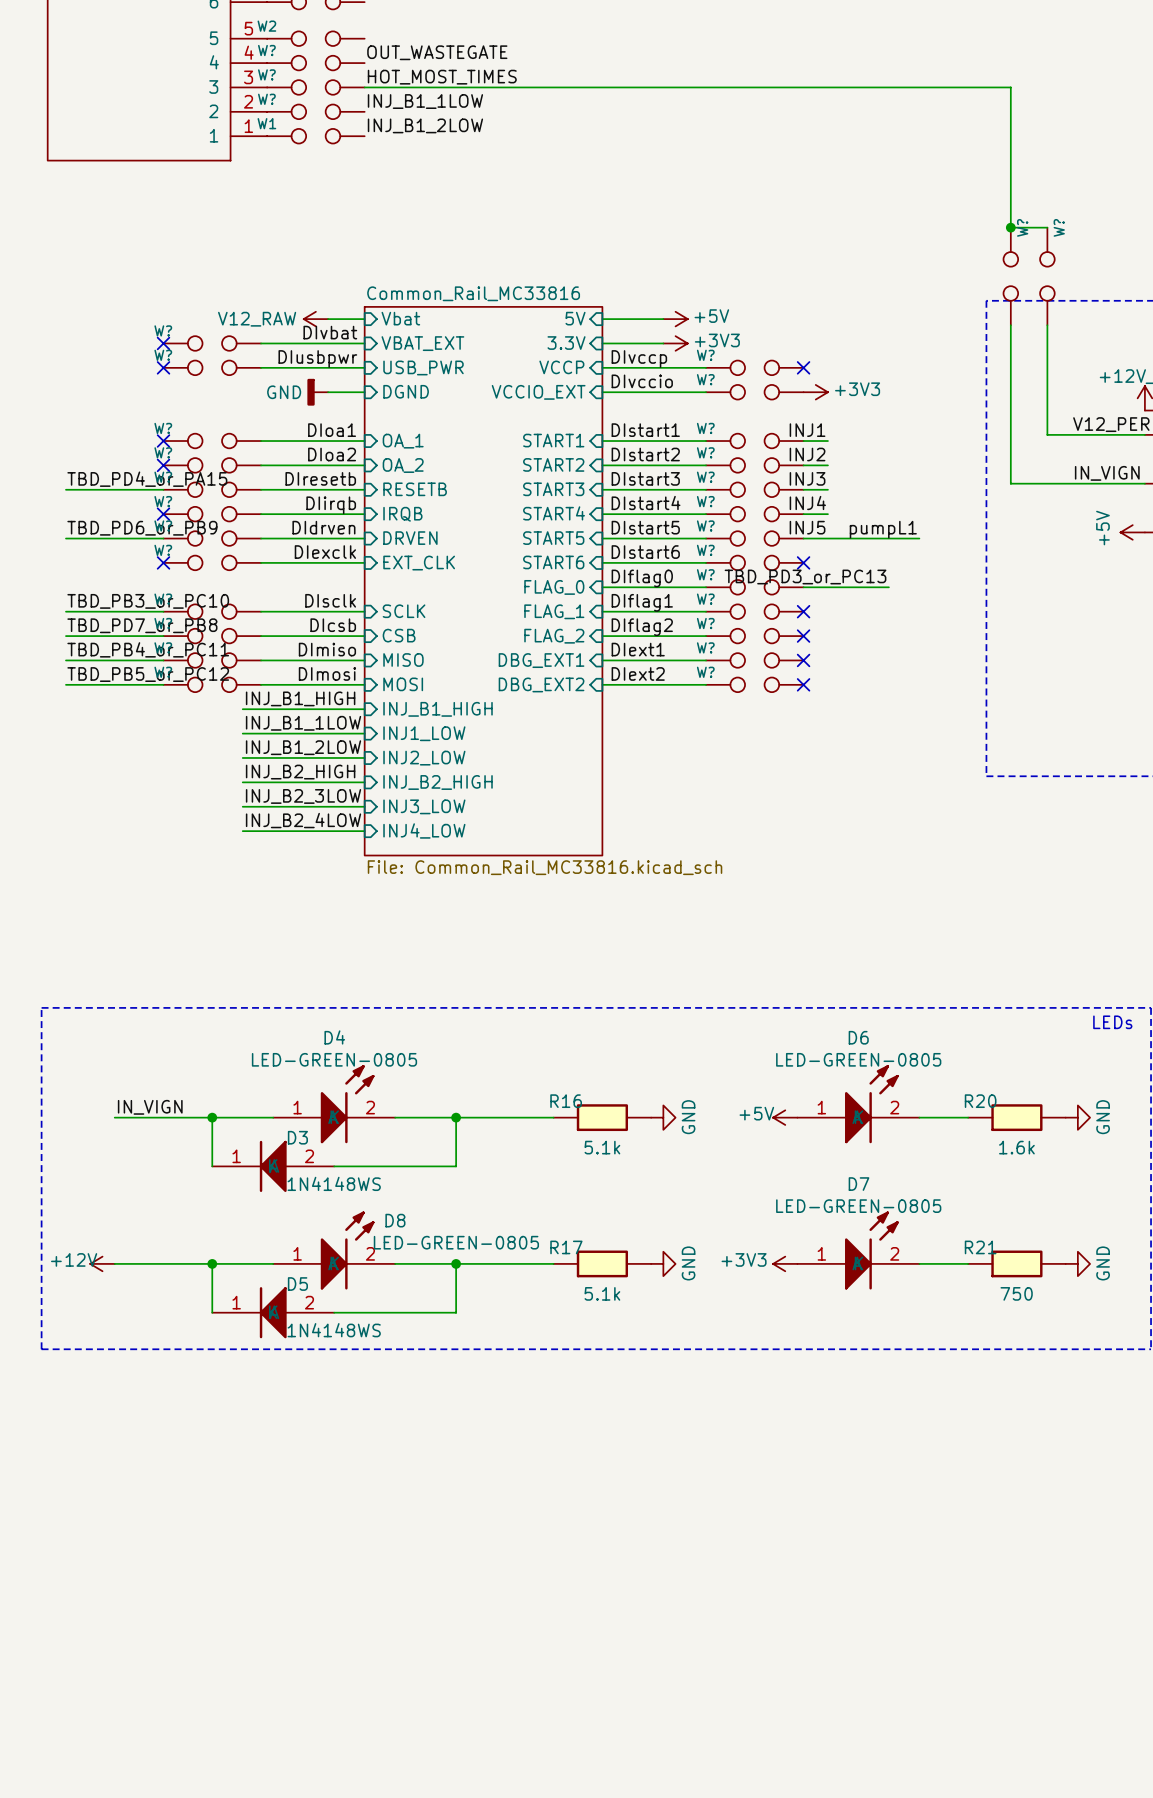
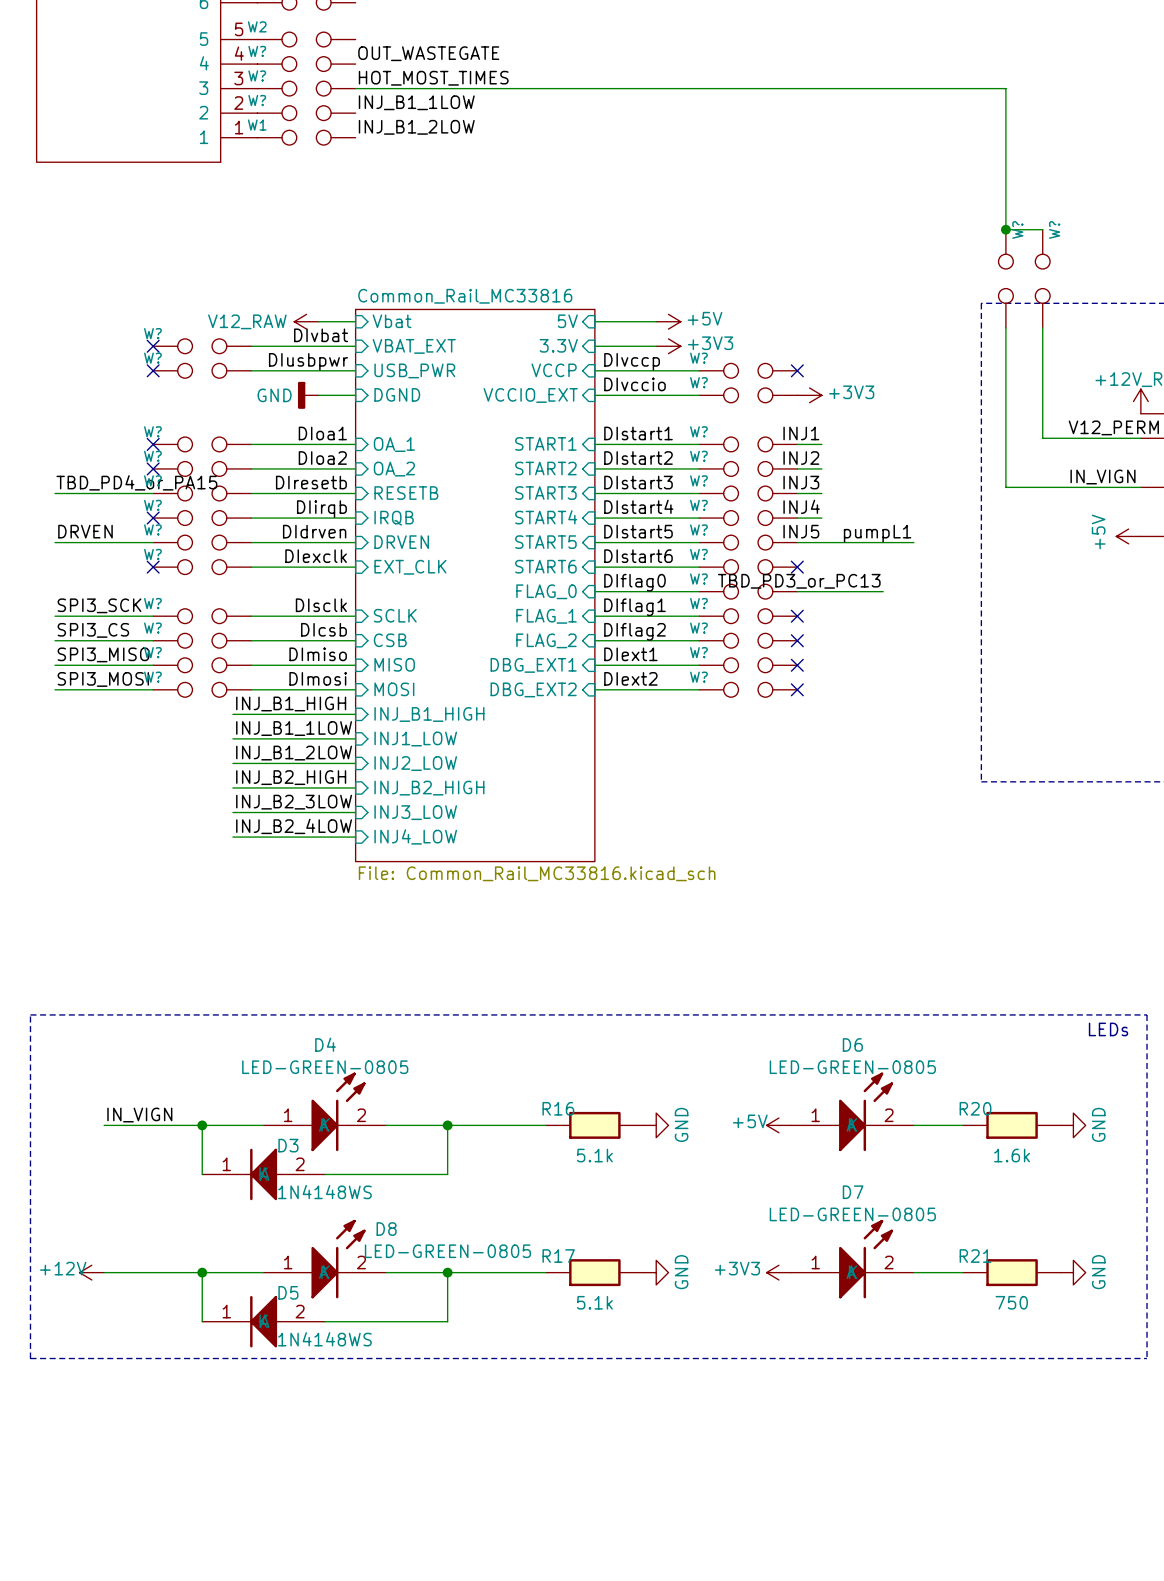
label: TBD_PD6_or_PB9 (142, 528) -> DRVEN (85, 531)
label: TBD_PB3_or_PC10 (148, 601) -> SPI3_SCK (99, 605)
label: TBD_PD7_or_PB8 (142, 625) -> SPI3_CS (93, 630)
label: TBD_PB4_or_PC11 (148, 649) -> SPI3_MISO (103, 654)
label: TBD_PB5_or_PC12 (148, 674) -> SPI3_MOSI (103, 679)

